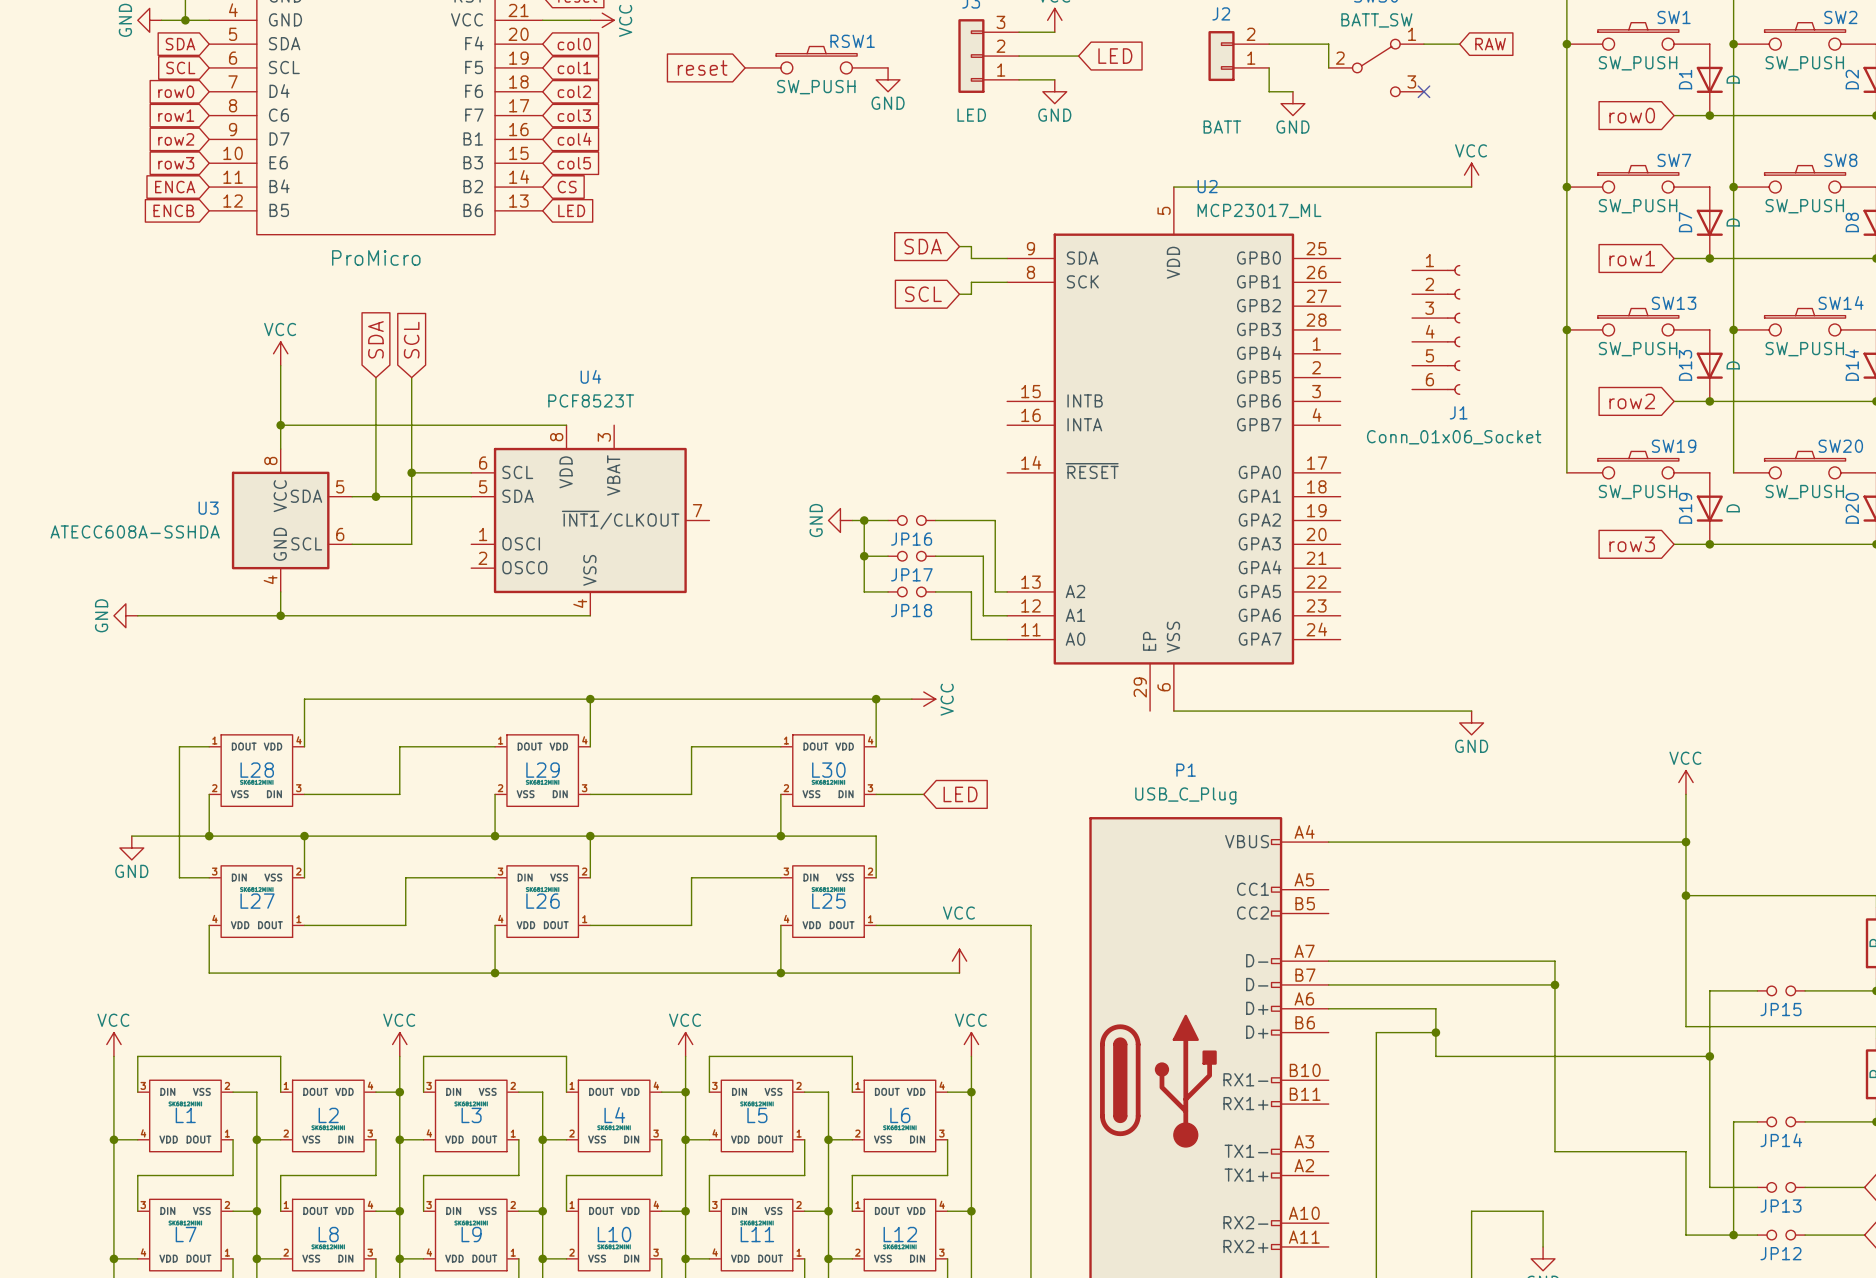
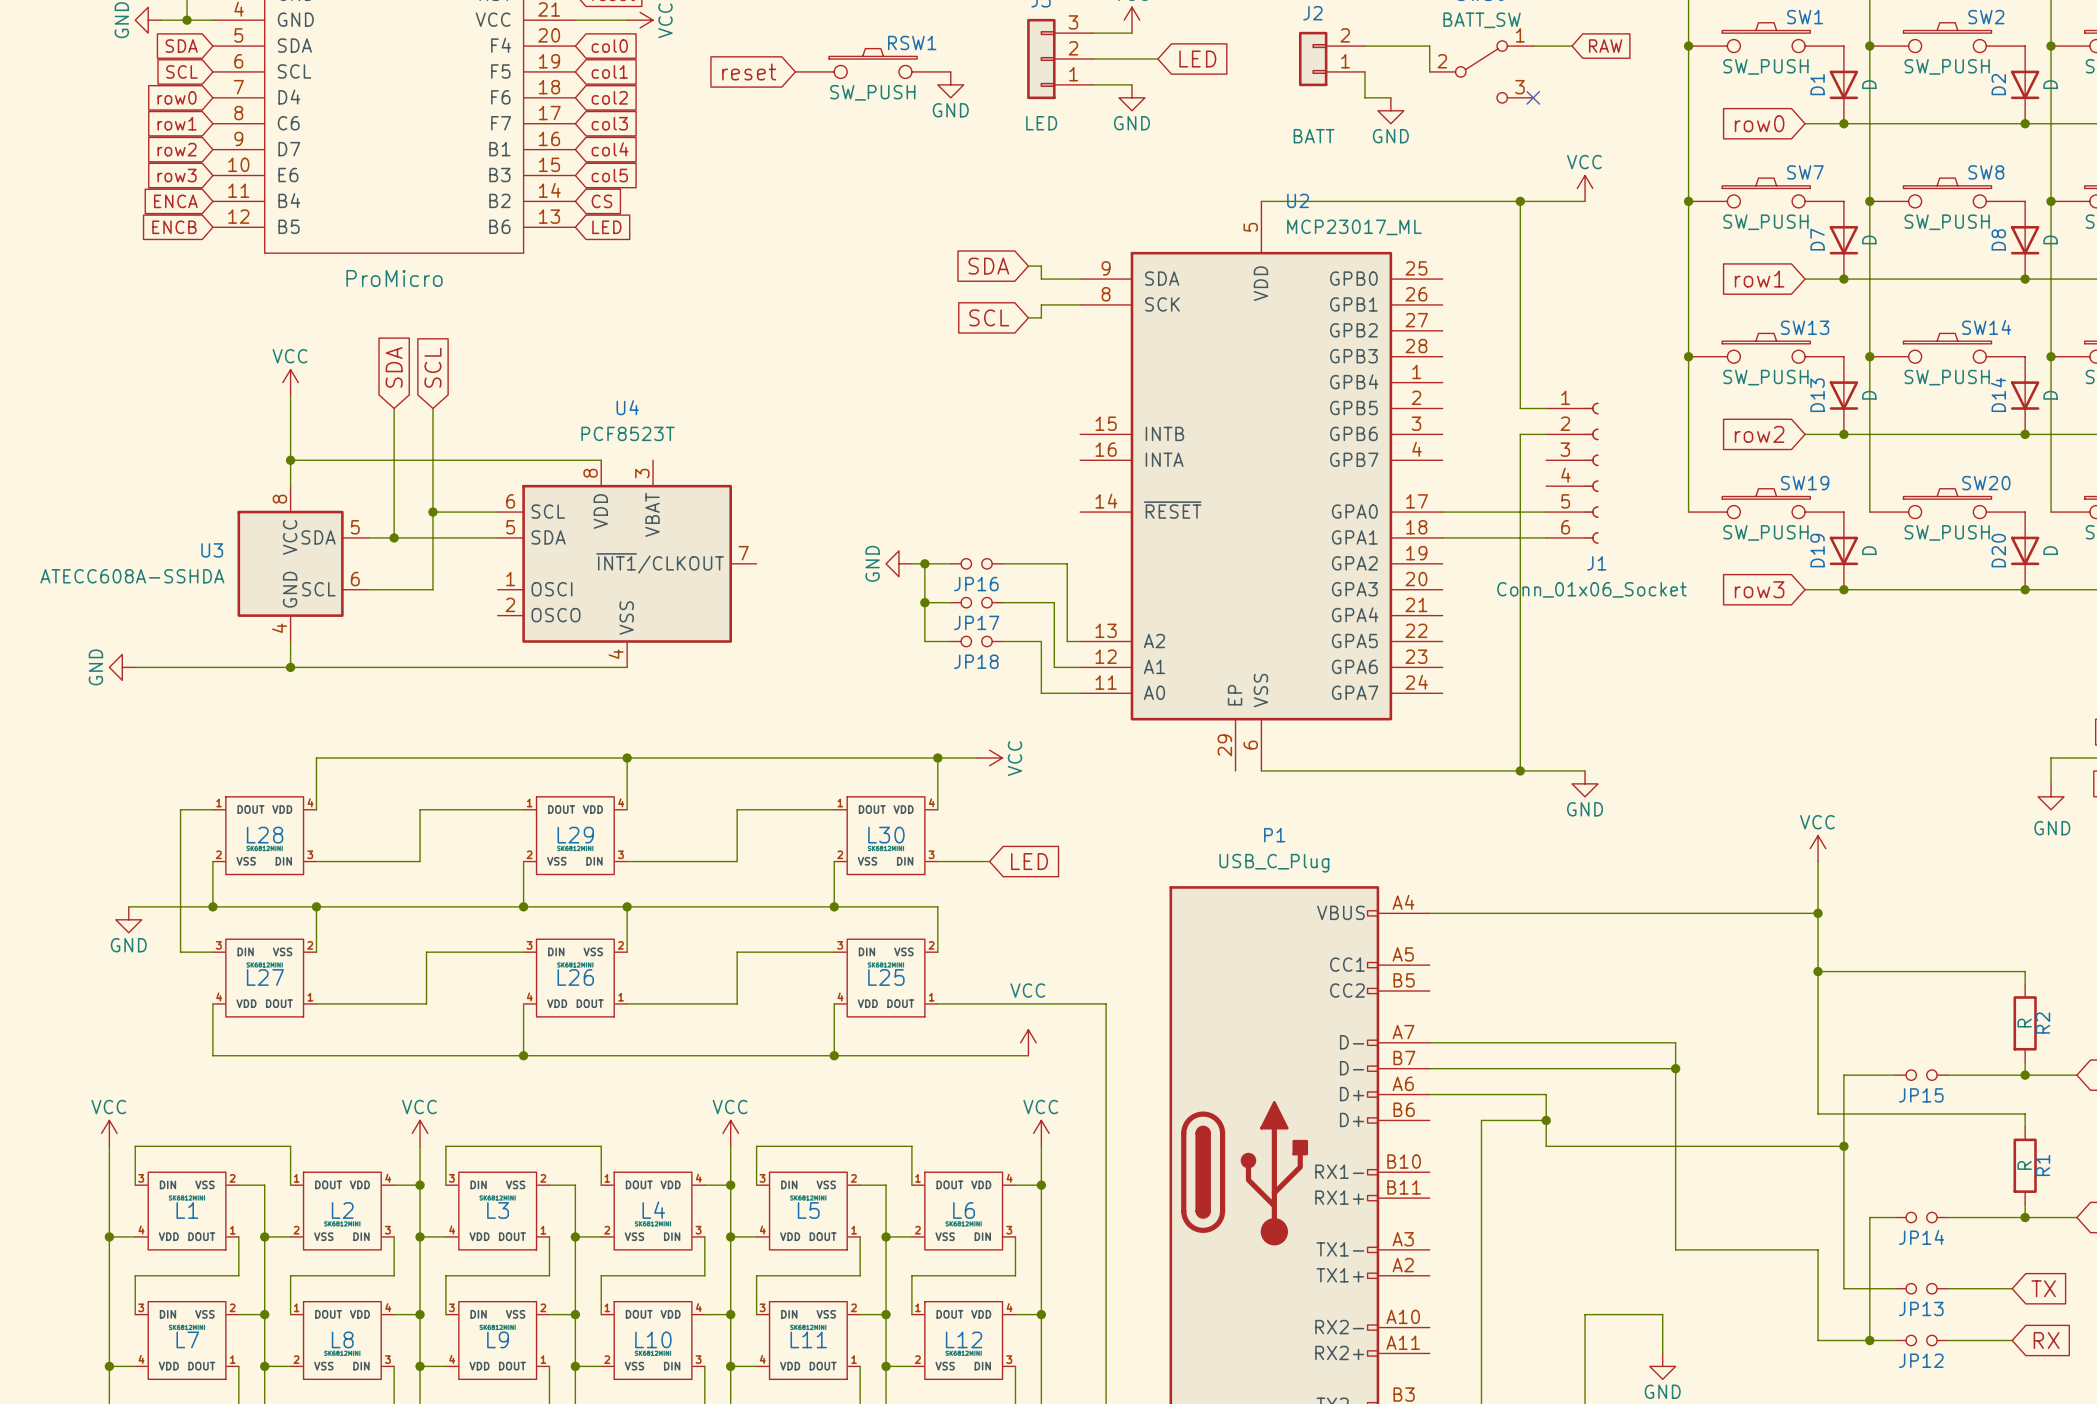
wire: none -> (1520, 201) (1520, 408) (1546, 408)
junction: none -> (1520, 201)
J1 position: (1436, 329) -> (1572, 473)
wire: none -> (1546, 434) (1520, 434) (1520, 770)
wire: none -> (1442, 512) (1546, 512)
wire: none -> (1442, 537) (1546, 537)
junction: none -> (1520, 770)

